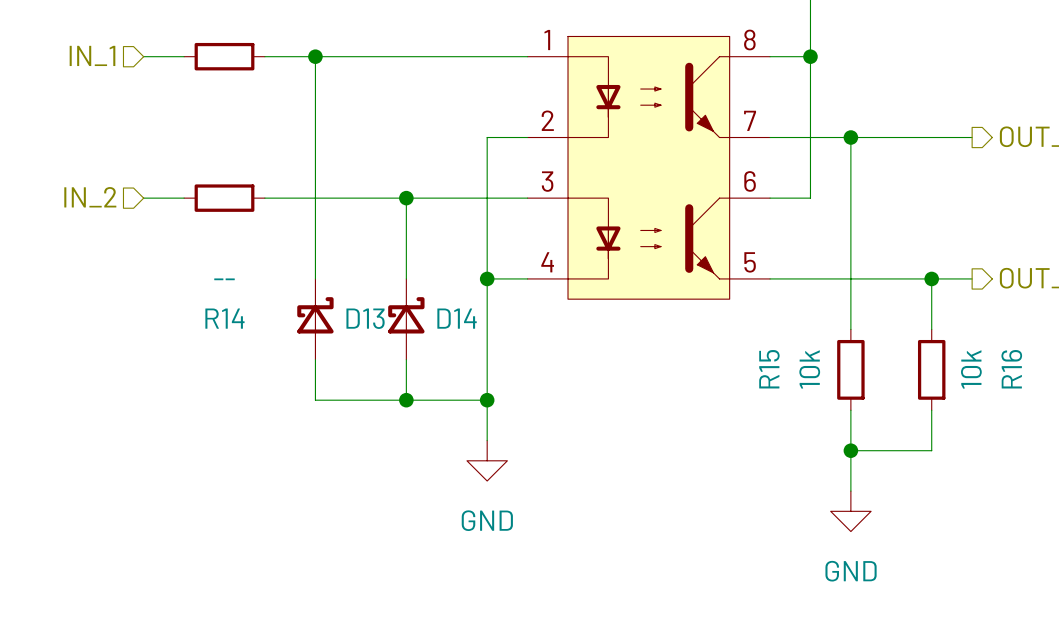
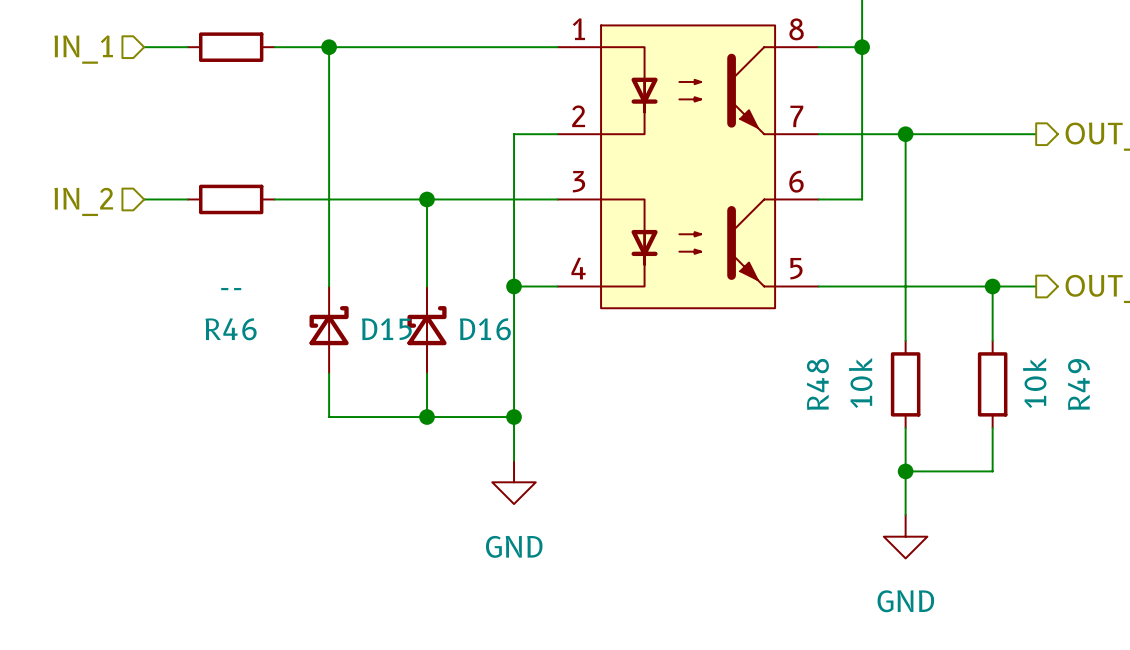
R14 name: R14 (224, 318) -> R46 (231, 329)
D13 name: D13 (365, 318) -> D15 (386, 329)
D14 name: D14 (457, 318) -> D16 (485, 329)
R15 name: R15 (769, 369) -> R48 (817, 384)
R16 name: R16 (1011, 369) -> R49 (1078, 384)

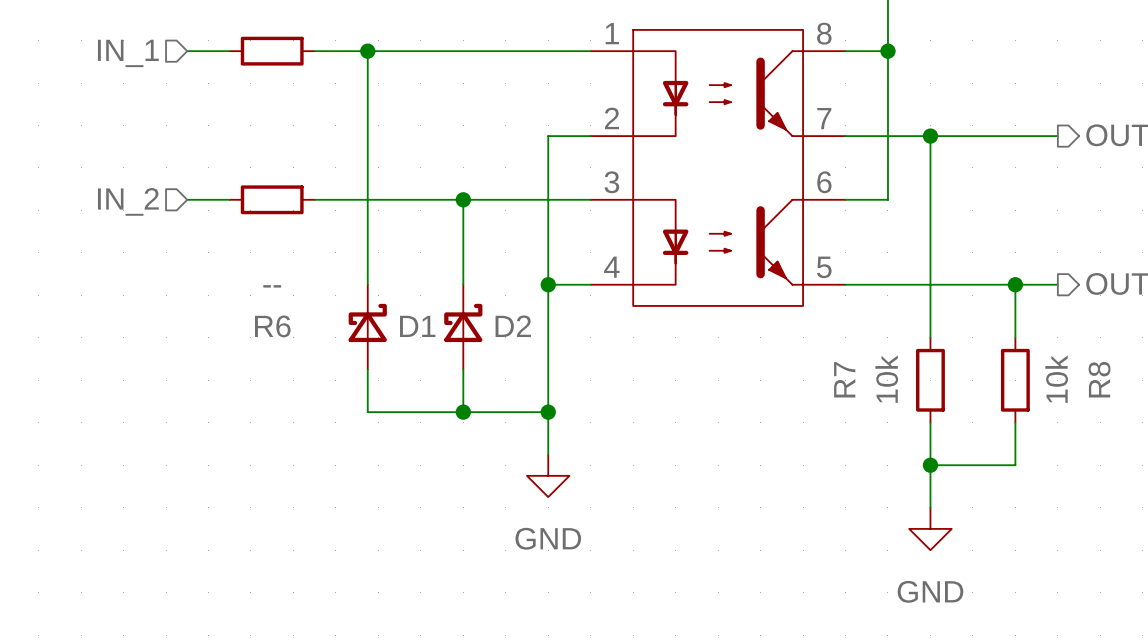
R46 name: R46 (231, 329) -> R6 (272, 326)
D15 name: D15 (386, 329) -> D1 (417, 326)
D16 name: D16 (485, 329) -> D2 (513, 326)
R48 name: R48 (817, 384) -> R7 (844, 379)
R49 name: R49 (1078, 384) -> R8 (1099, 379)

